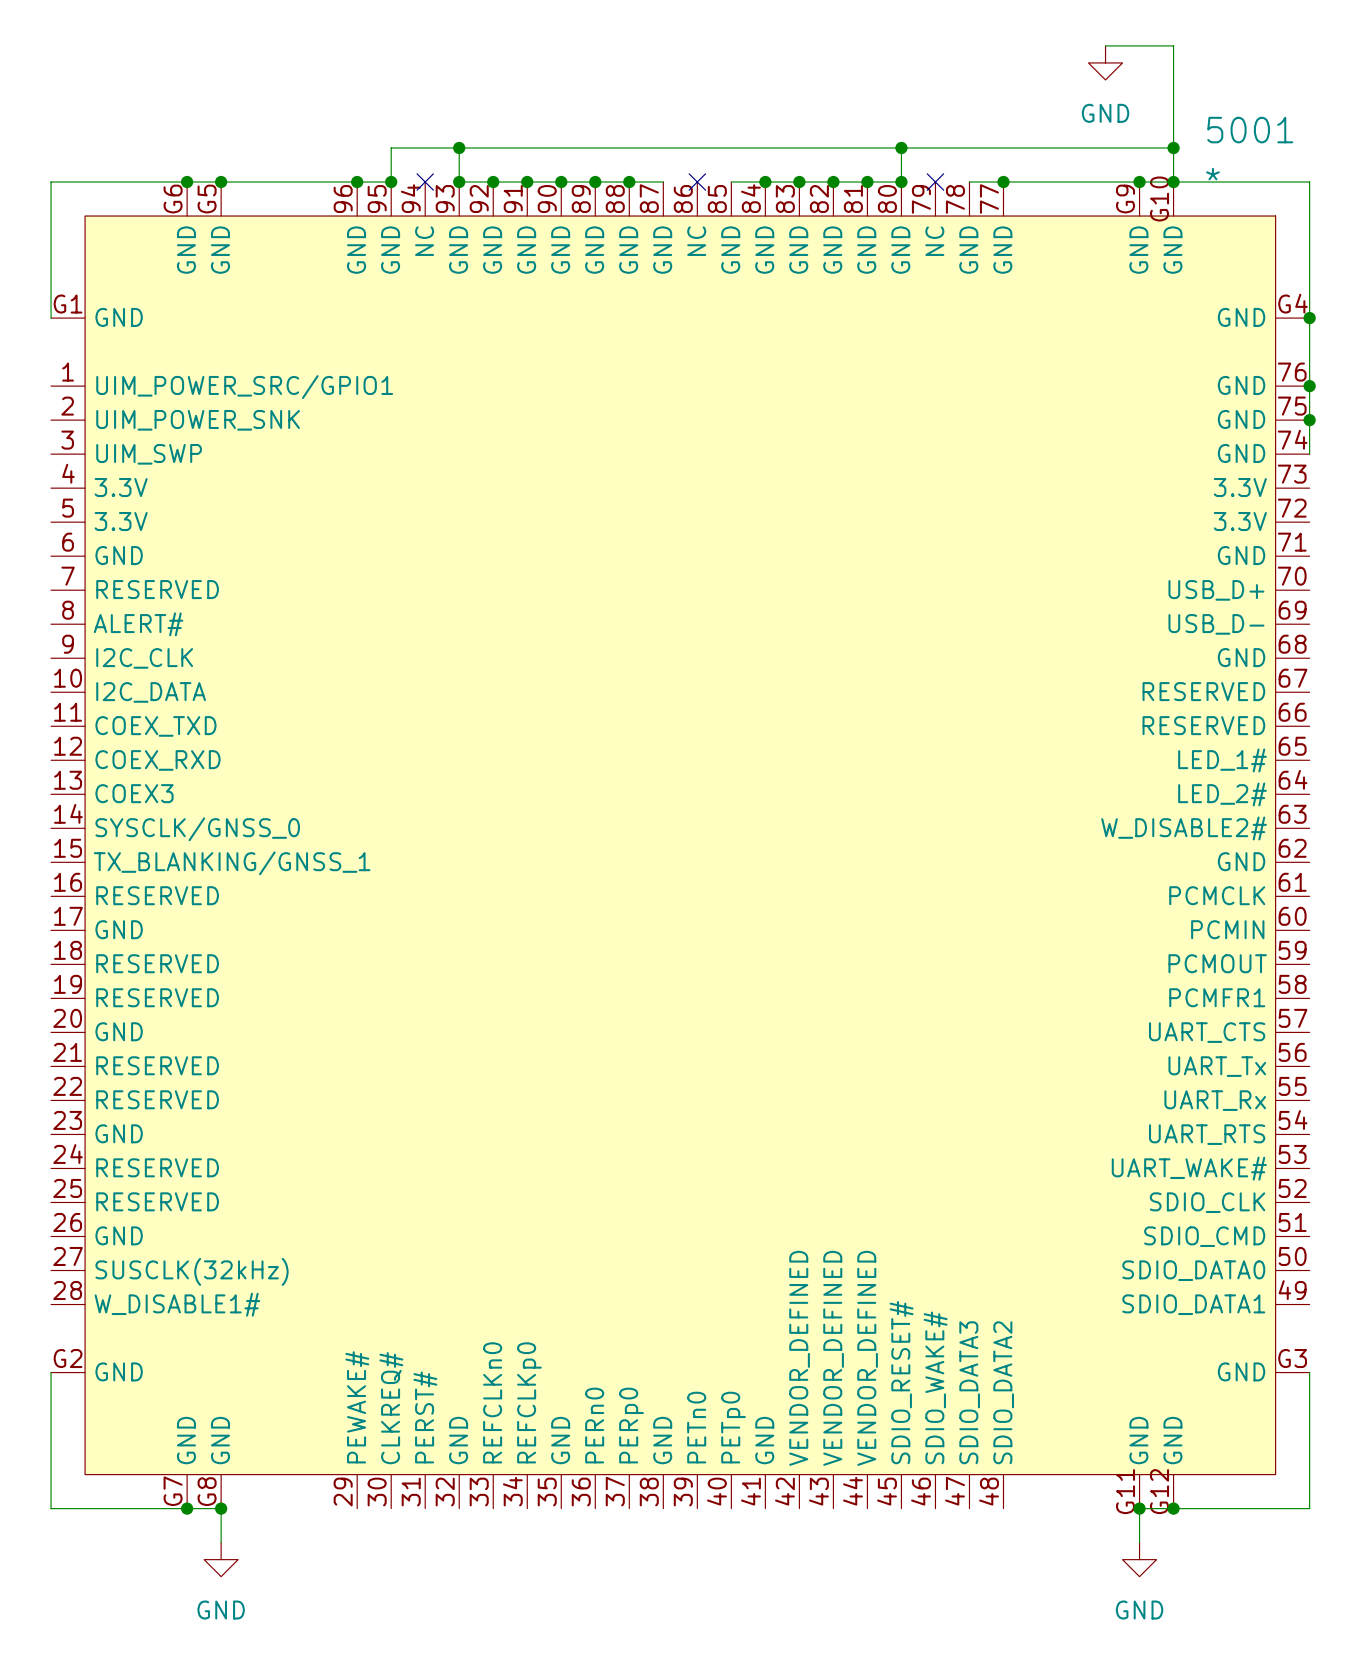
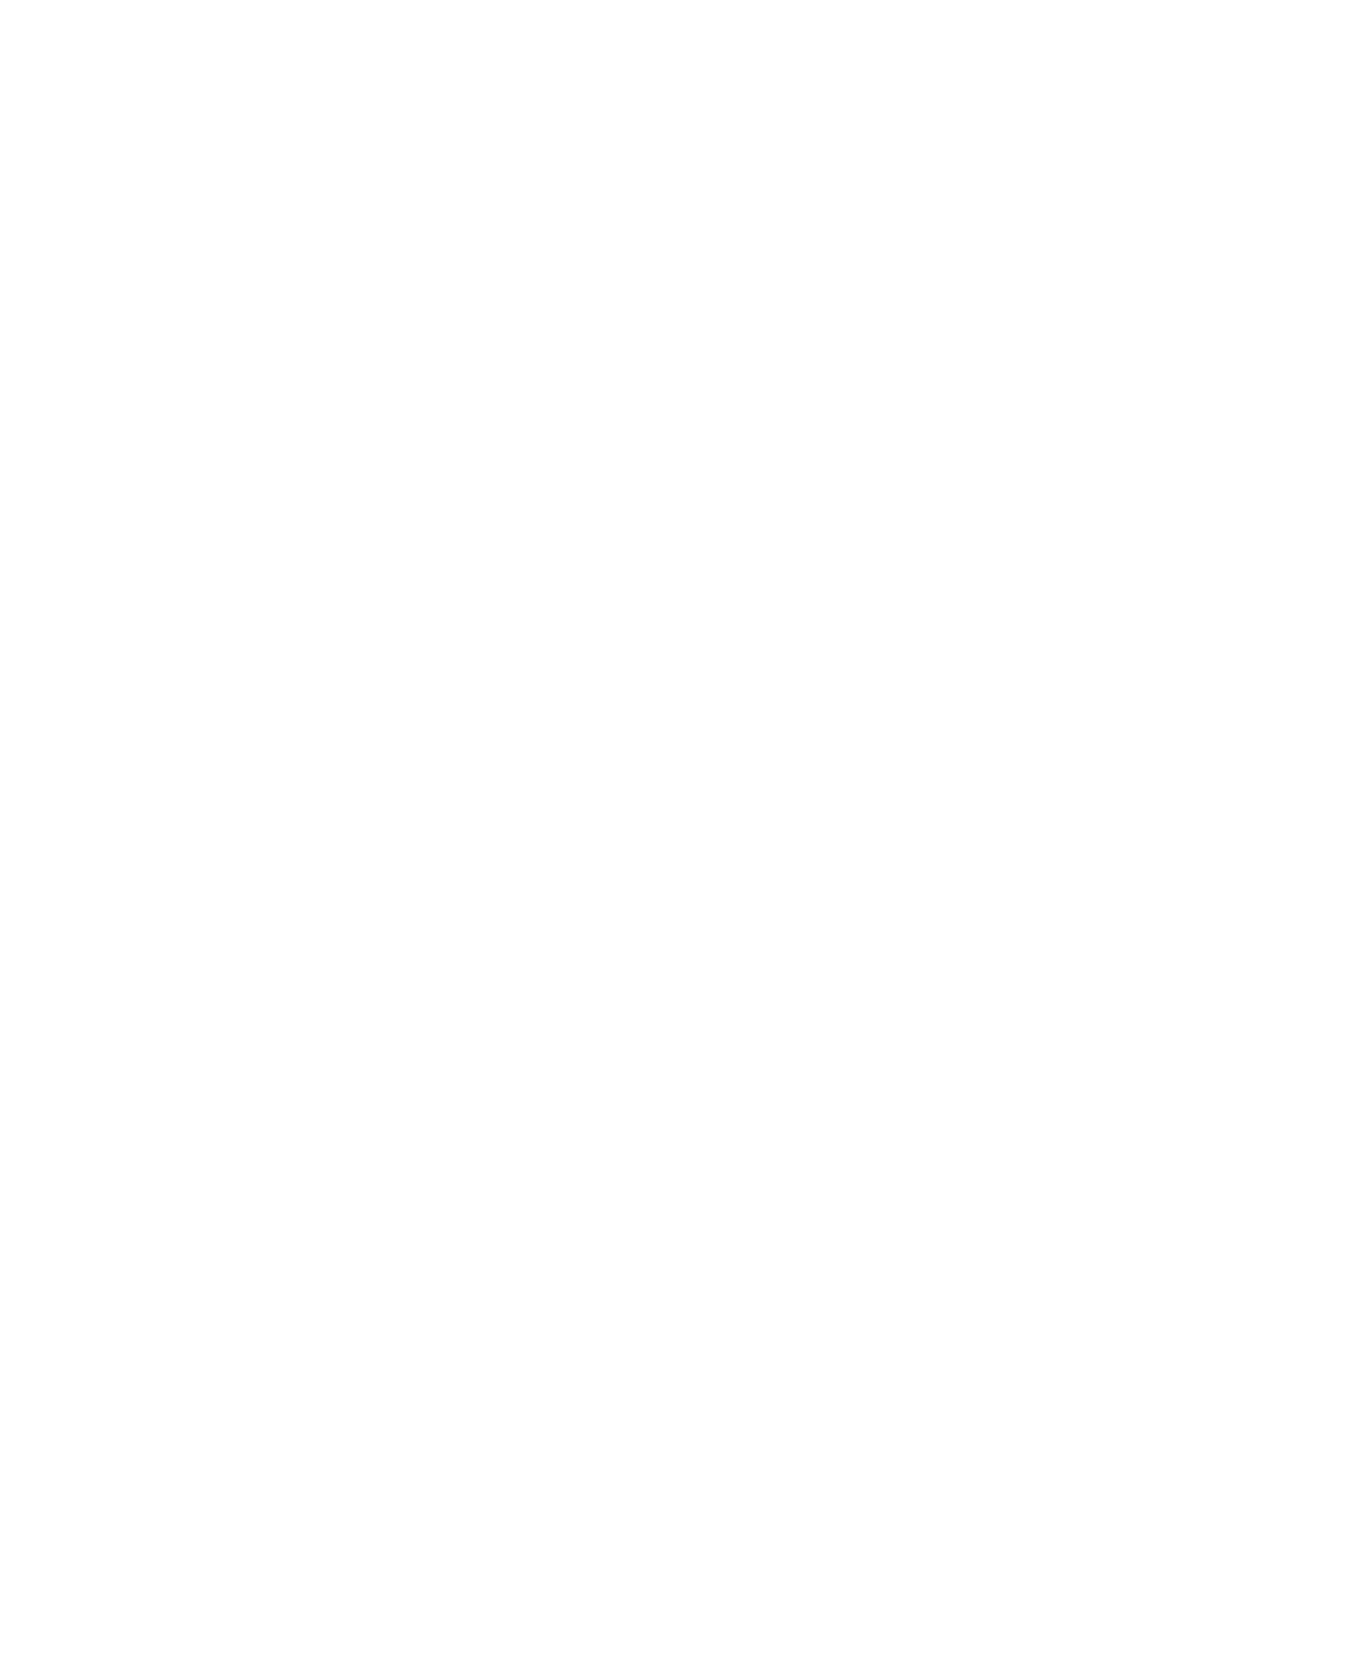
wire: (1105, 45) (1173, 45) (1173, 182) -> none
power symbol: GND (1105, 62) -> none
wire: (459, 147) (459, 182) (663, 182) -> none
junction: (459, 147) -> none
wire: (901, 147) (901, 182) (731, 182) -> none
junction: (901, 147) -> none
wire: (1173, 147) (391, 147) (391, 182) (51, 182) (51, 318) -> none
junction: (1173, 147) -> none
junction: (187, 182) -> none
junction: (221, 182) -> none
junction: (357, 182) -> none
junction: (391, 182) -> none
no-connect mark: (425, 182) -> none
junction: (459, 182) -> none
junction: (493, 182) -> none
junction: (527, 182) -> none
junction: (561, 182) -> none
junction: (595, 182) -> none
junction: (629, 182) -> none
no-connect mark: (697, 182) -> none
junction: (765, 182) -> none
junction: (799, 182) -> none
junction: (833, 182) -> none
junction: (867, 182) -> none
junction: (901, 182) -> none
no-connect mark: (935, 182) -> none
wire: (969, 182) (1309, 182) (1309, 454) -> none
junction: (1003, 182) -> none
junction: (1139, 182) -> none
junction: (1173, 182) -> none
junction: (1309, 318) -> none
junction: (1309, 386) -> none
junction: (1309, 420) -> none
5001: * (680, 845) -> none
wire: (51, 1372) (51, 1508) (221, 1508) (221, 1542) -> none
wire: (1309, 1372) (1309, 1508) (1139, 1508) (1139, 1542) -> none
junction: (187, 1508) -> none
junction: (221, 1508) -> none
junction: (1139, 1508) -> none
junction: (1173, 1508) -> none
power symbol: GND (221, 1559) -> none
power symbol: GND (1139, 1559) -> none

